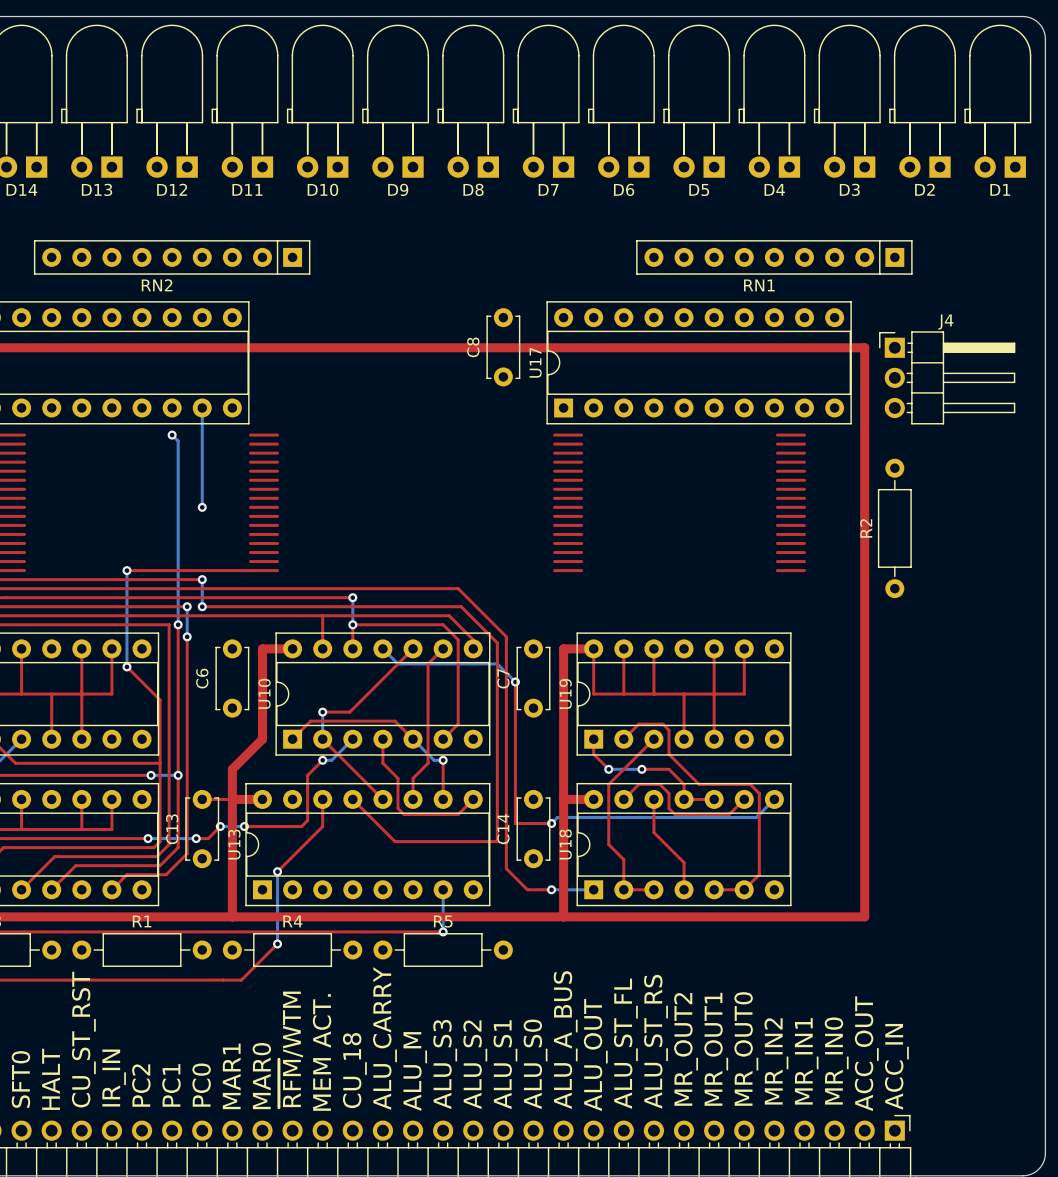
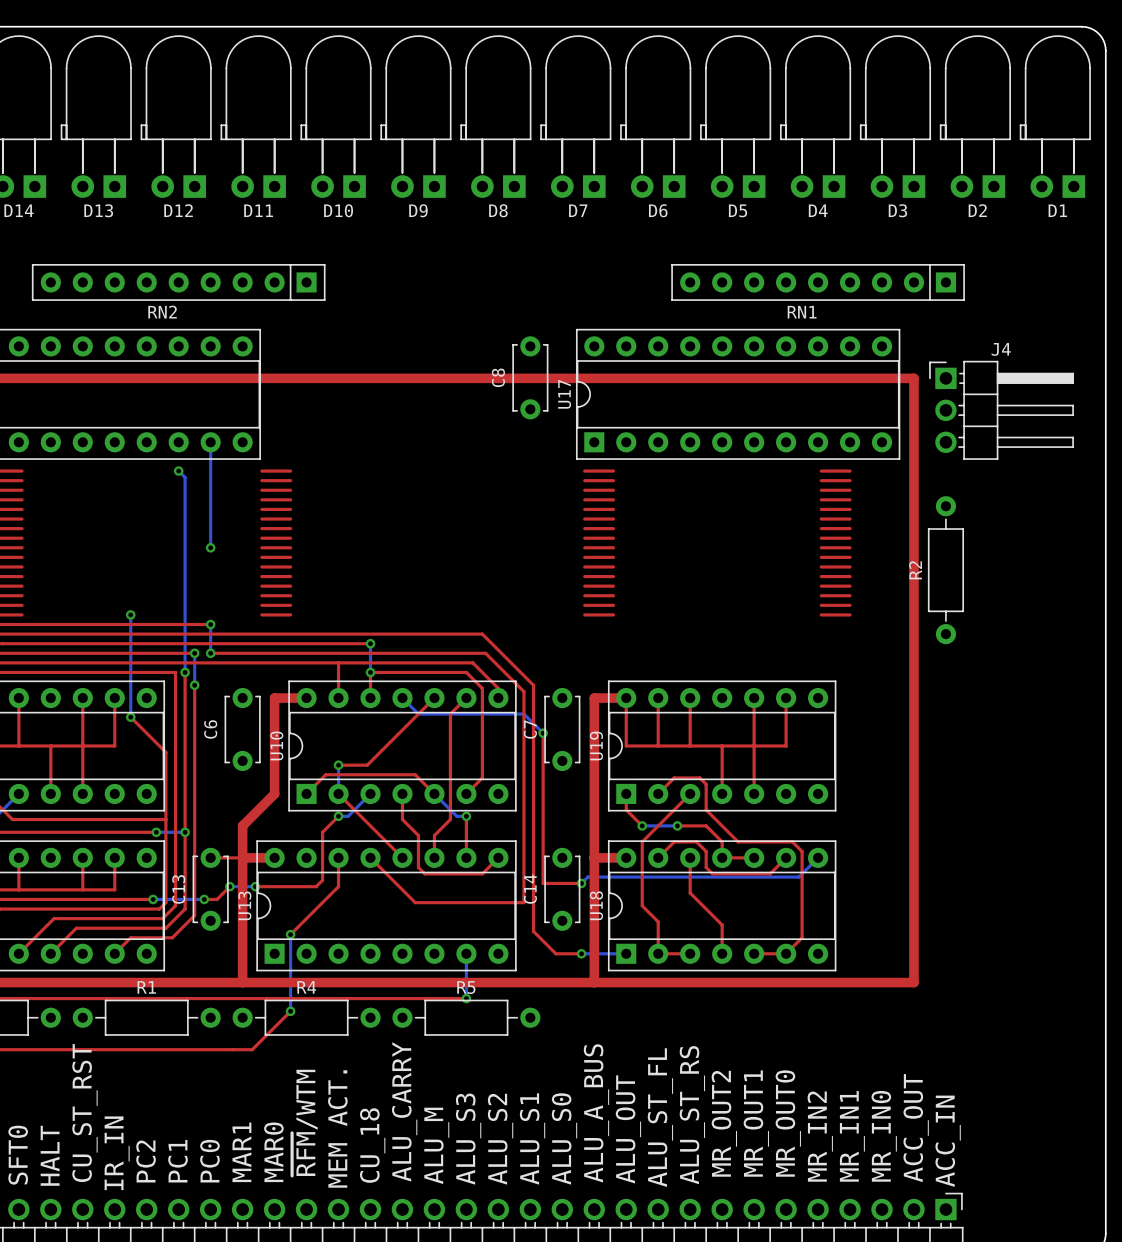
top track: (126, 570) (250, 570) -> none

